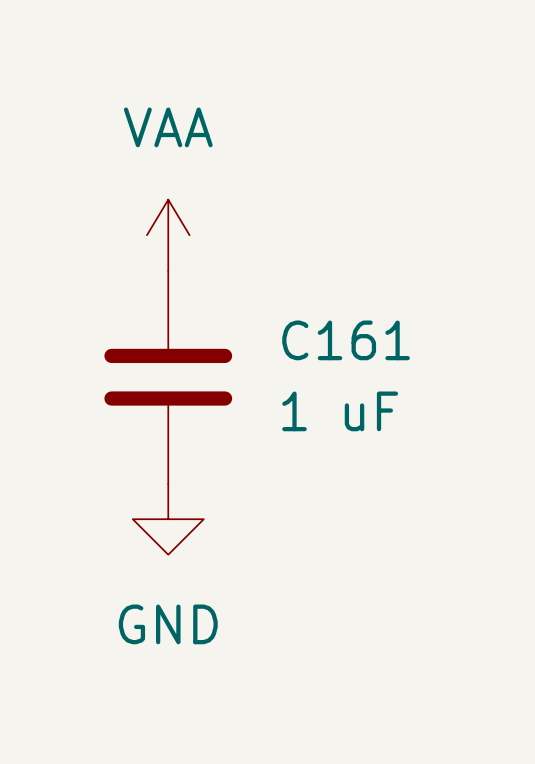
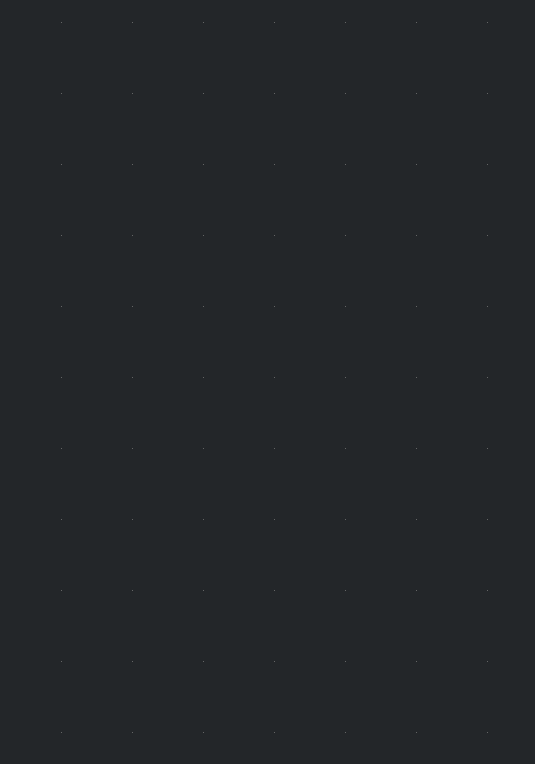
power symbol: VAA (168, 235) -> none
C161: 1 uF (168, 377) -> none
power symbol: GND (168, 519) -> none

